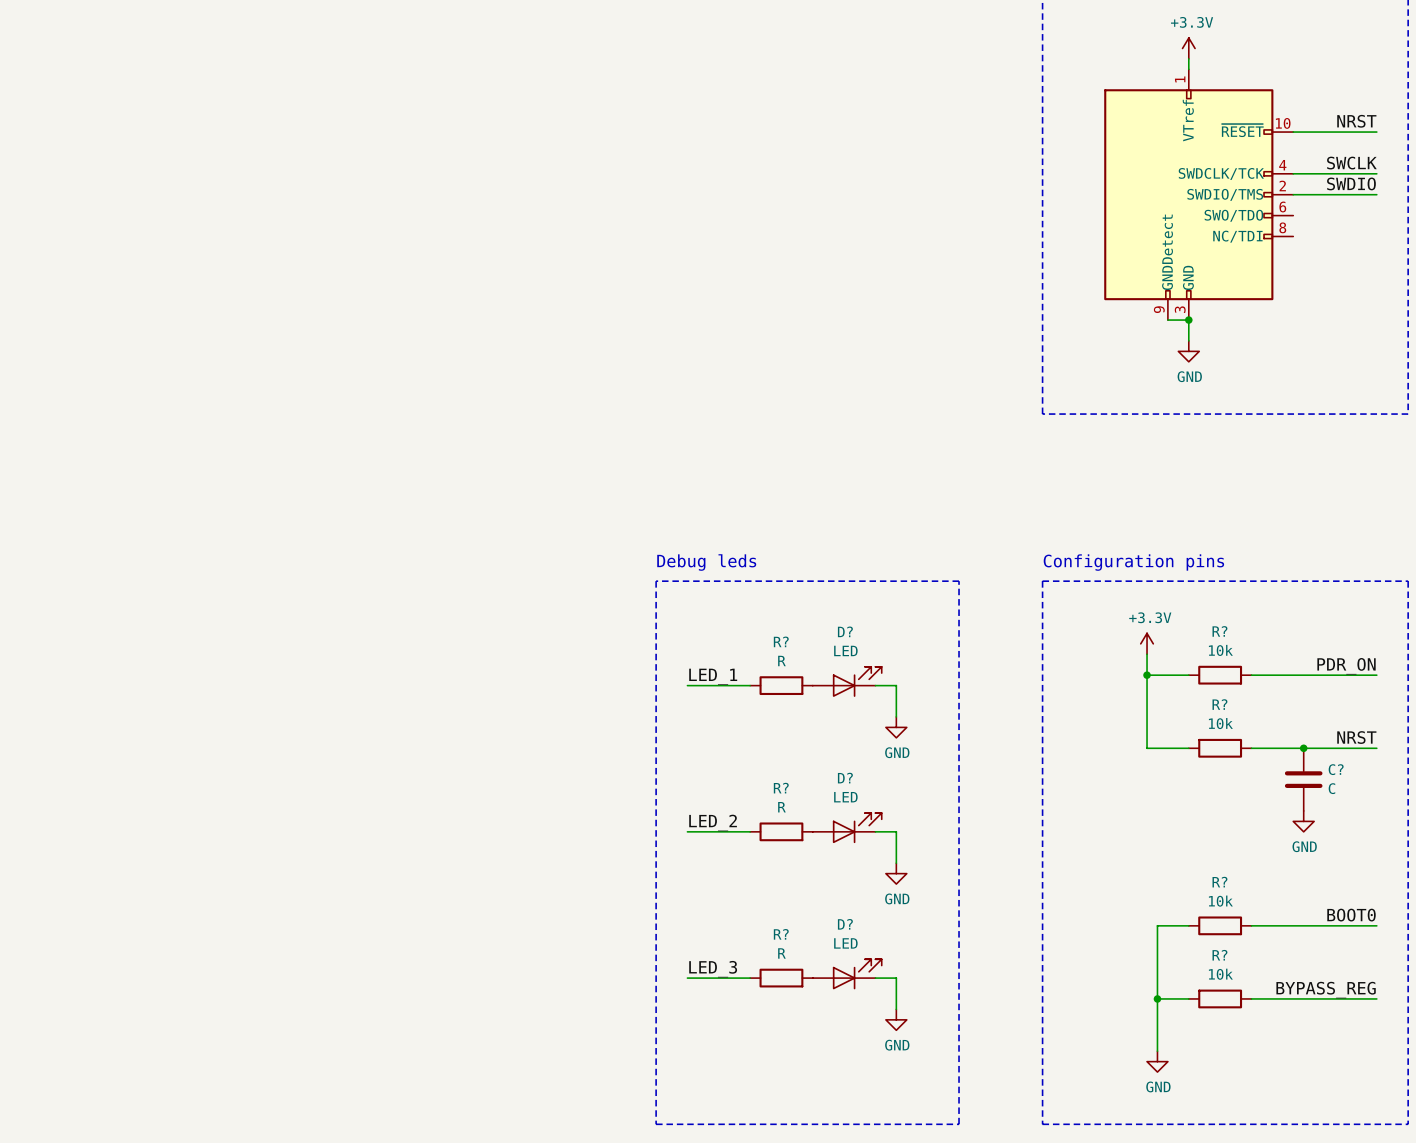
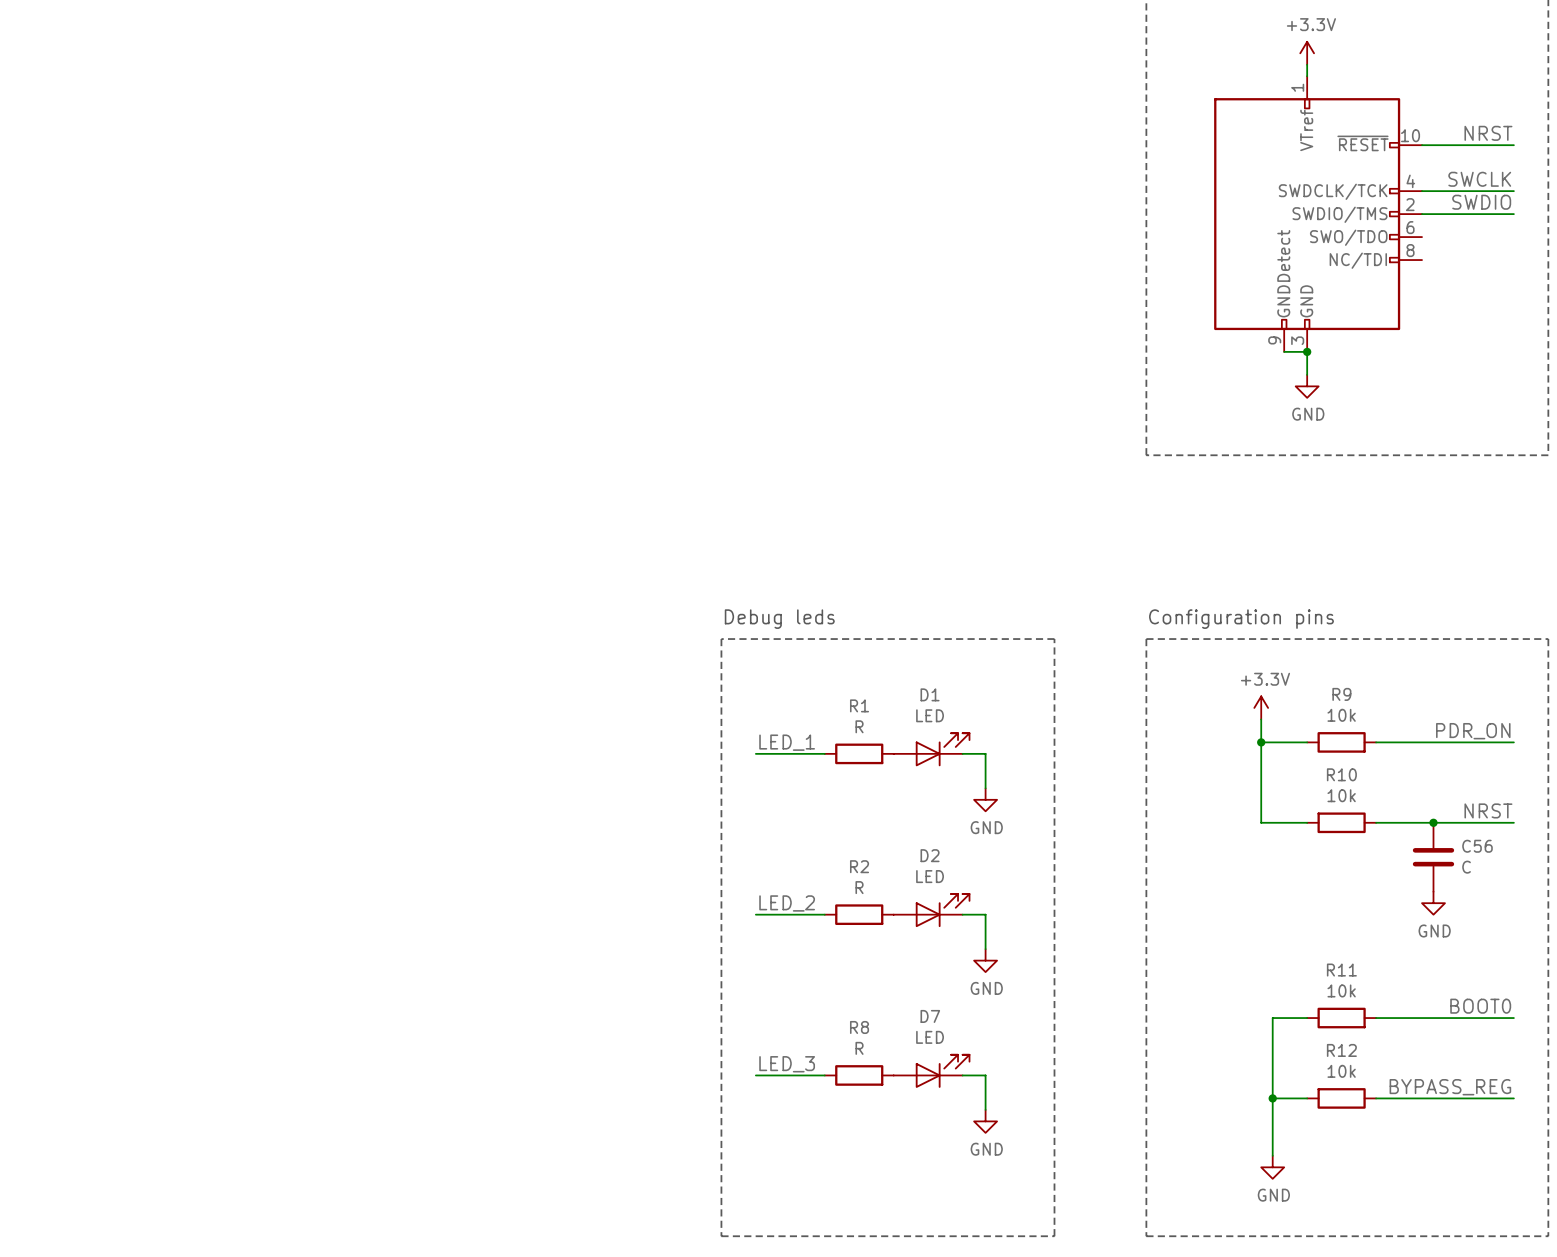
D? name: D? (845, 631) -> D1 (930, 694)
R? name: R? (1219, 631) -> R9 (1341, 694)
R? name: R? (781, 641) -> R1 (859, 705)
R? name: R? (1219, 704) -> R10 (1341, 774)
C? name: C? (1336, 769) -> C56 (1477, 846)
D? name: D? (845, 778) -> D2 (930, 855)
R? name: R? (781, 788) -> R2 (859, 866)
R? name: R? (1219, 882) -> R11 (1341, 970)
D? name: D? (845, 924) -> D7 (930, 1016)
R? name: R? (781, 934) -> R8 (859, 1027)
R? name: R? (1219, 955) -> R12 (1341, 1050)

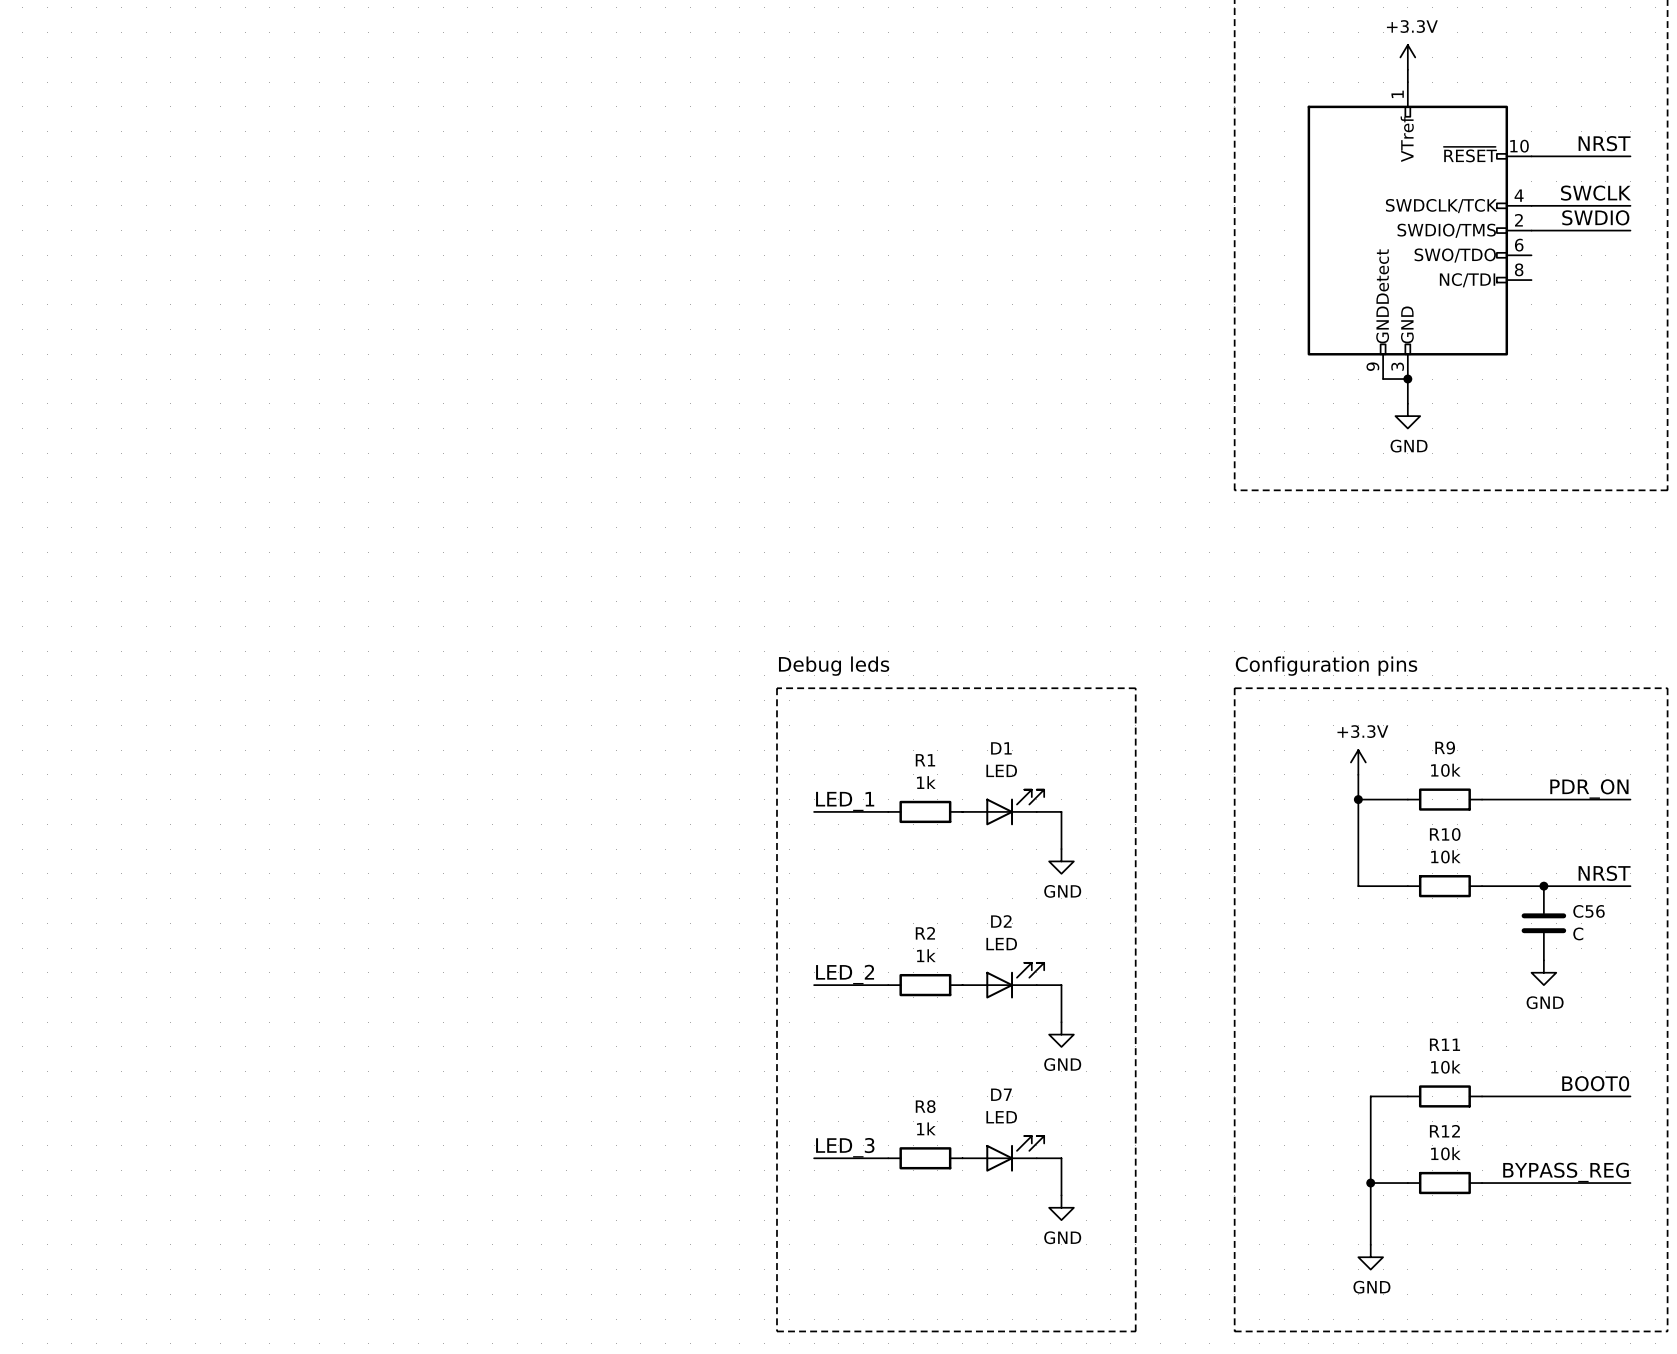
R1 value: R (859, 726) -> 1k (926, 782)
R2 value: R (859, 887) -> 1k (926, 955)
R8 value: R (859, 1048) -> 1k (926, 1128)

